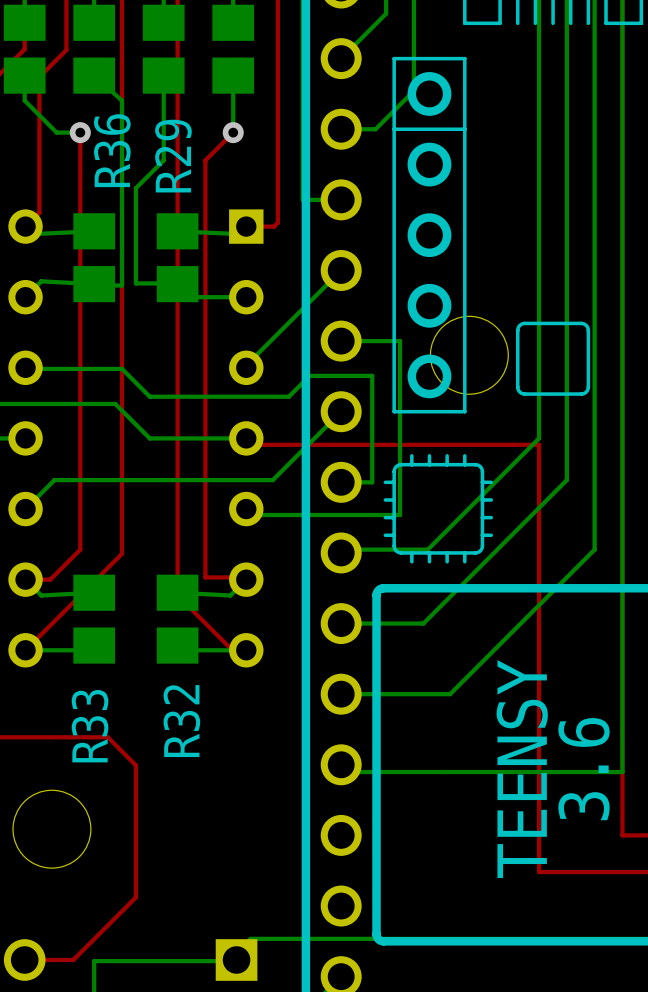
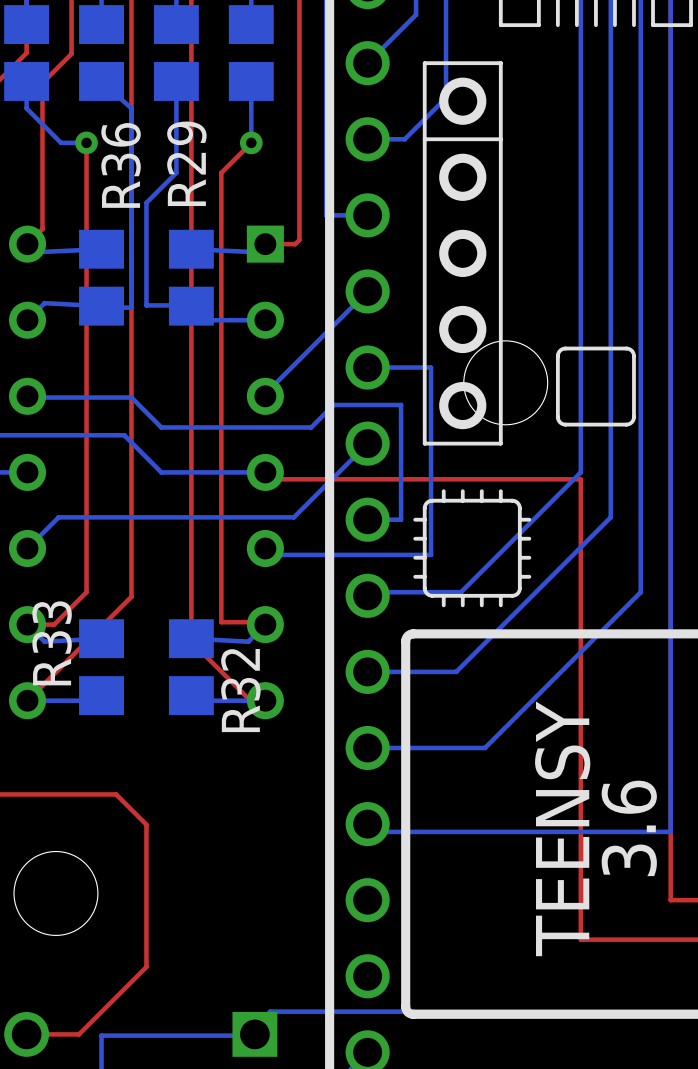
R32 name position: R32 (181, 721) -> R32 (240, 690)
R33 name position: R33 (90, 726) -> R33 (52, 643)

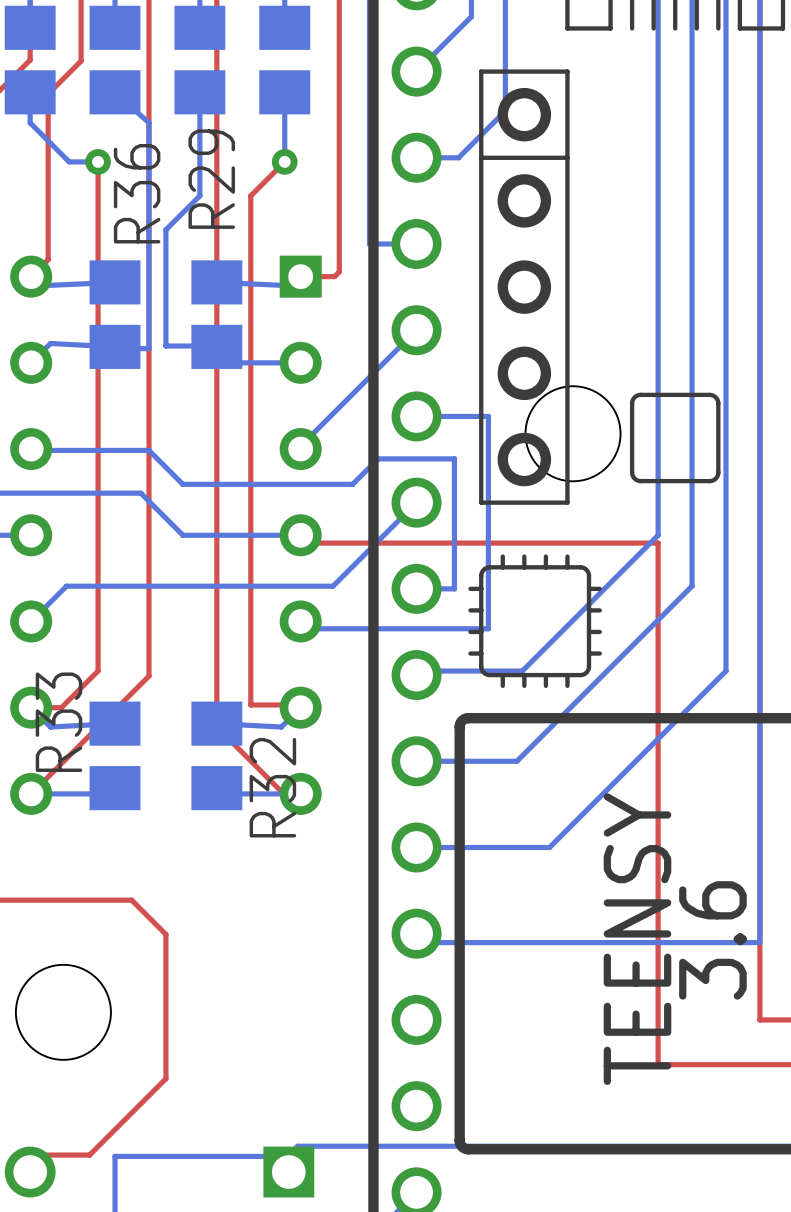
top track: (146, 952) (146, 967) (79, 1034) (26, 1034) -> (165, 1078) (89, 1155) (30, 1155)
bottom track: (270, 1011) (254, 1026) (253, 1035) (101, 1035) -> (306, 1146) (297, 1146) (287, 1156) (115, 1156) (115, 1173)

